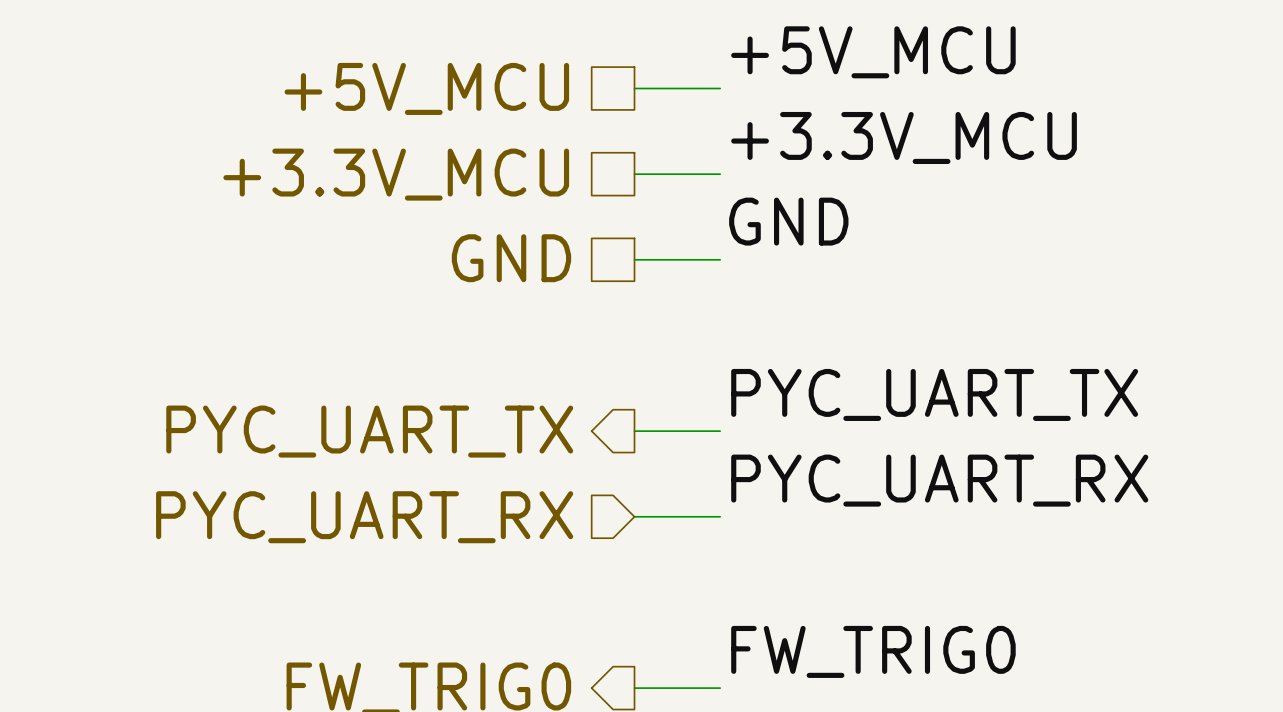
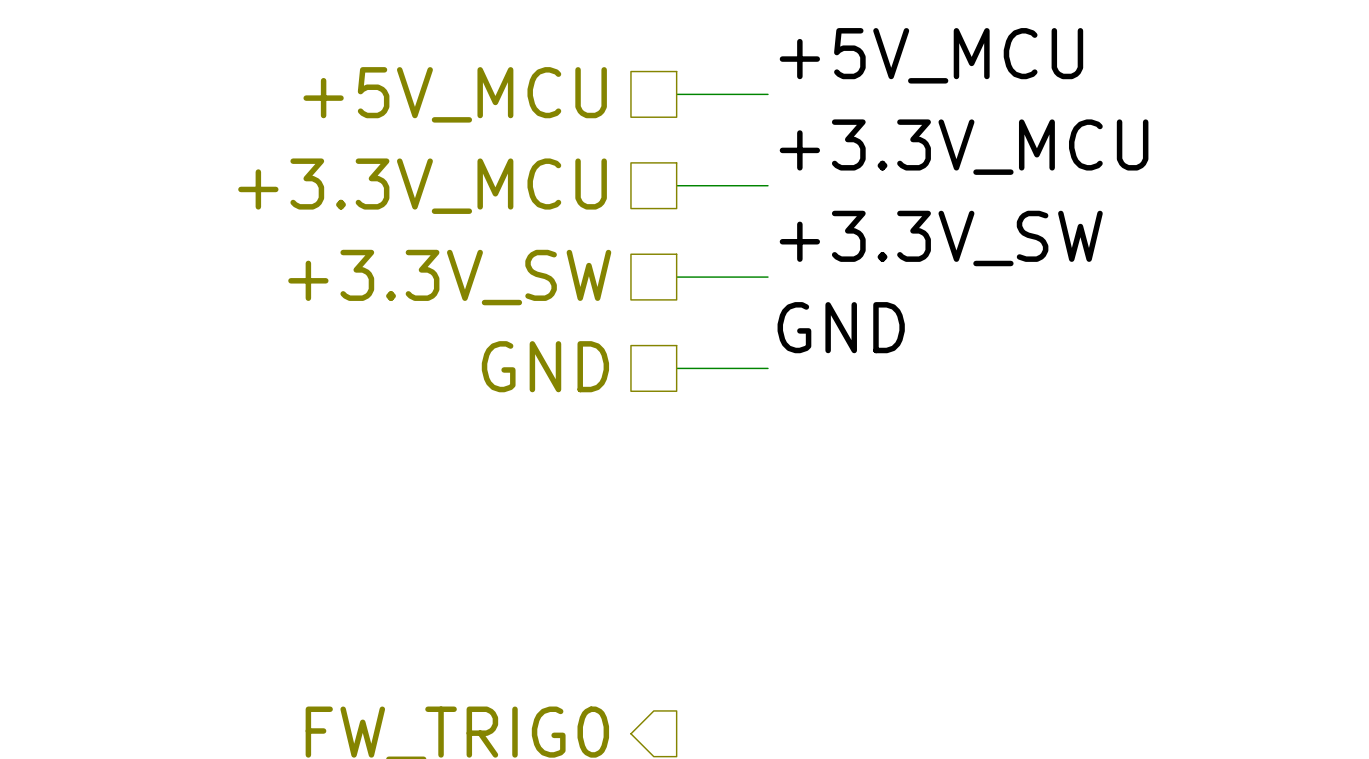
label: GND (788, 221) -> +3.3V_SW (941, 238)
hierarchical label: GND (511, 258) -> +3.3V_SW (449, 277)
label: none -> GND (841, 327)
hierarchical label: none -> GND (545, 366)
label: PYC_UART_TX (934, 394) -> none
hierarchical label: PYC_UART_TX (369, 431) -> none
wire: (634, 431) (720, 431) -> (676, 368) (767, 368)
label: PYC_UART_RX (939, 480) -> none
wire: (634, 516) (720, 516) -> none
hierarchical label: PYC_UART_RX (364, 517) -> none
label: FW_TRIG0 (873, 651) -> none
wire: (634, 688) (720, 688) -> none

